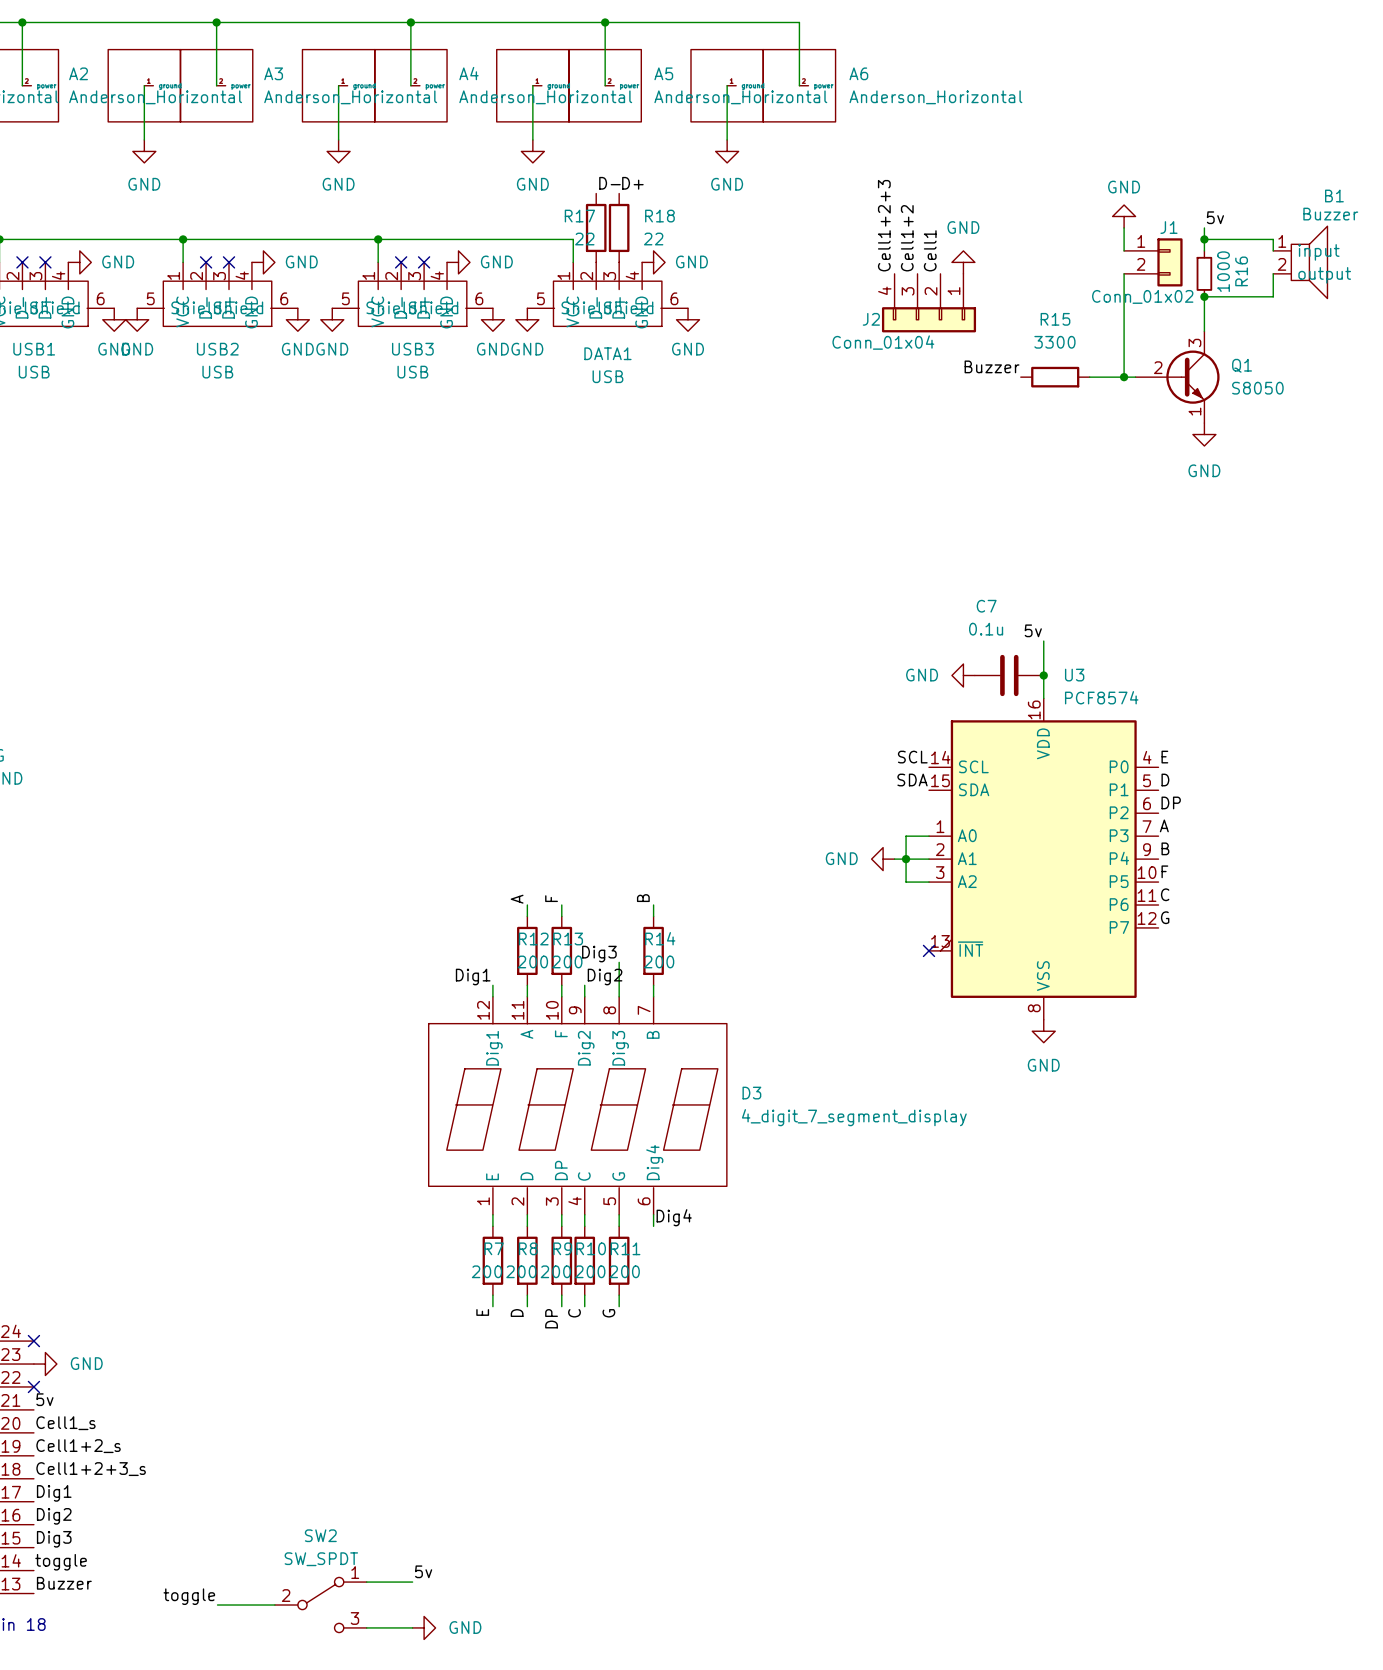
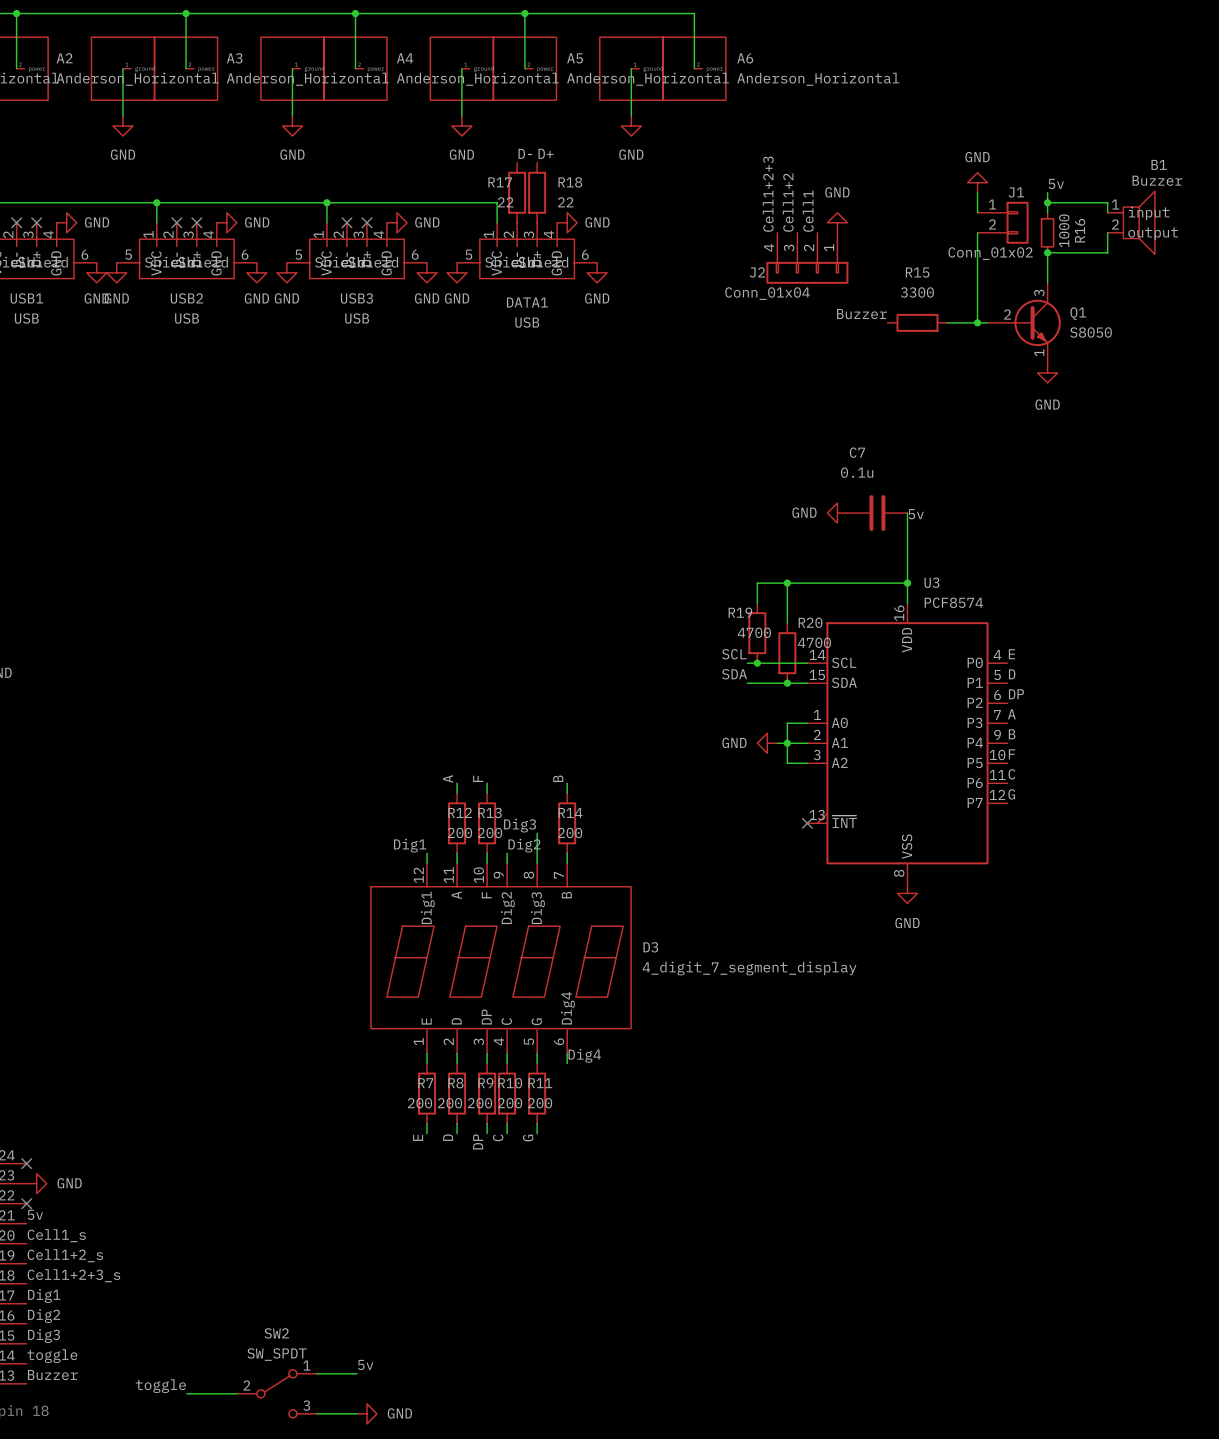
wire: none -> (907, 513) (907, 553)
label position: 5v (1033, 630) -> 5v (916, 514)
wire: none -> (787, 583) (787, 623)
junction: none -> (787, 583)
power symbol position: GND (963, 675) -> GND (837, 513)
C7 position: (1009, 675) -> (877, 513)
wire: none -> (907, 583) (757, 583) (757, 603)
R19: none -> 4700 (757, 633)
R20: none -> 4700 (787, 653)
label position: SCL (912, 757) -> SCL (734, 654)
wire: none -> (747, 663) (807, 663)
junction: none -> (757, 663)
label position: SDA (912, 780) -> SDA (734, 674)
wire: none -> (747, 683) (807, 683)
junction: none -> (787, 683)

